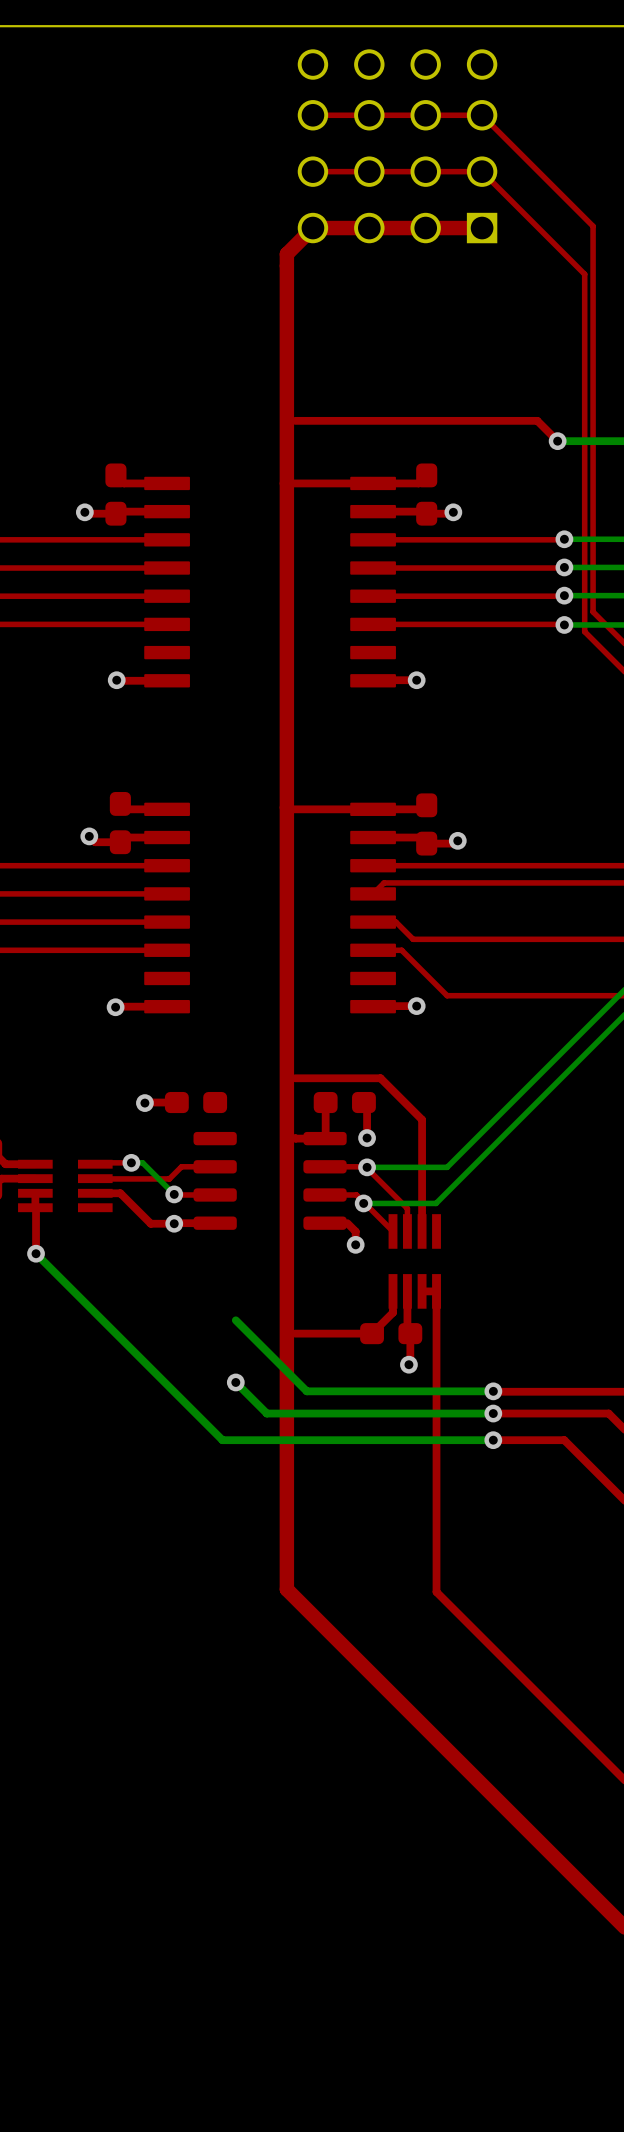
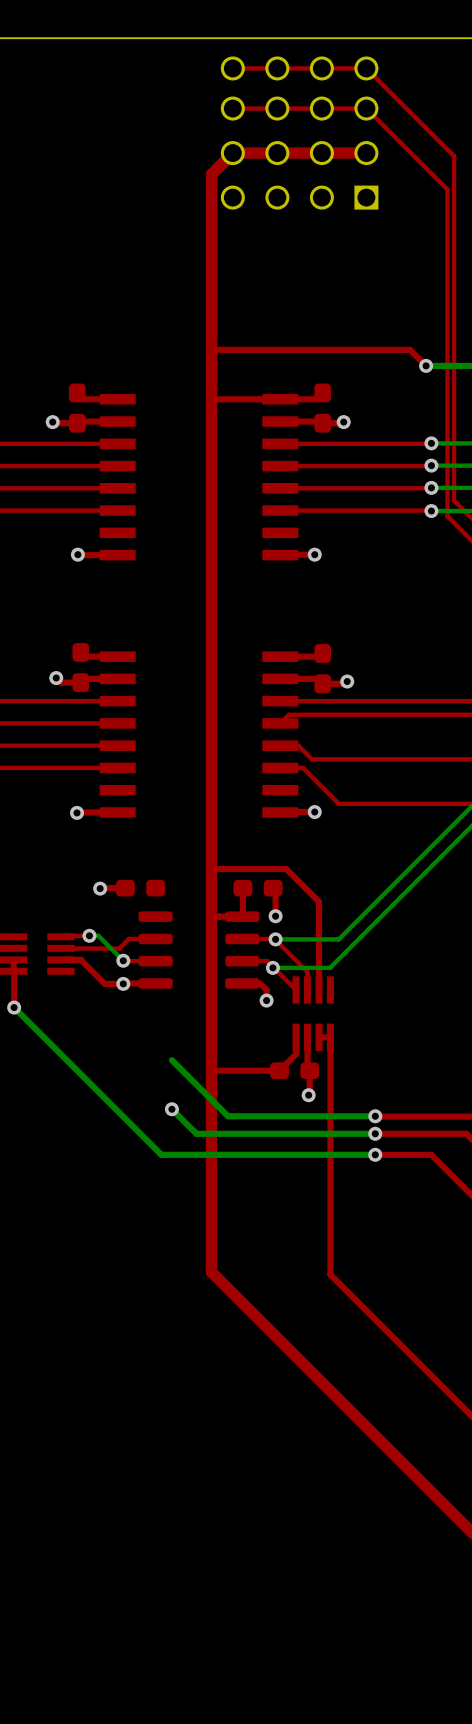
top track: none -> (232, 68) (366, 68) (454, 156) (454, 196)
top track: none -> (232, 153) (211, 174) (212, 399)
top track: (482, 171) (584, 274) -> none
top track width: thin (482, 171) (312, 171) -> thick (366, 153) (232, 153)
top track: (584, 217) (593, 226) -> (447, 189) (447, 234)
top track: (482, 228) (312, 228) (286, 254) (286, 1589) -> (211, 400) (212, 1272)
top track: (373, 809) (288, 809) -> none

